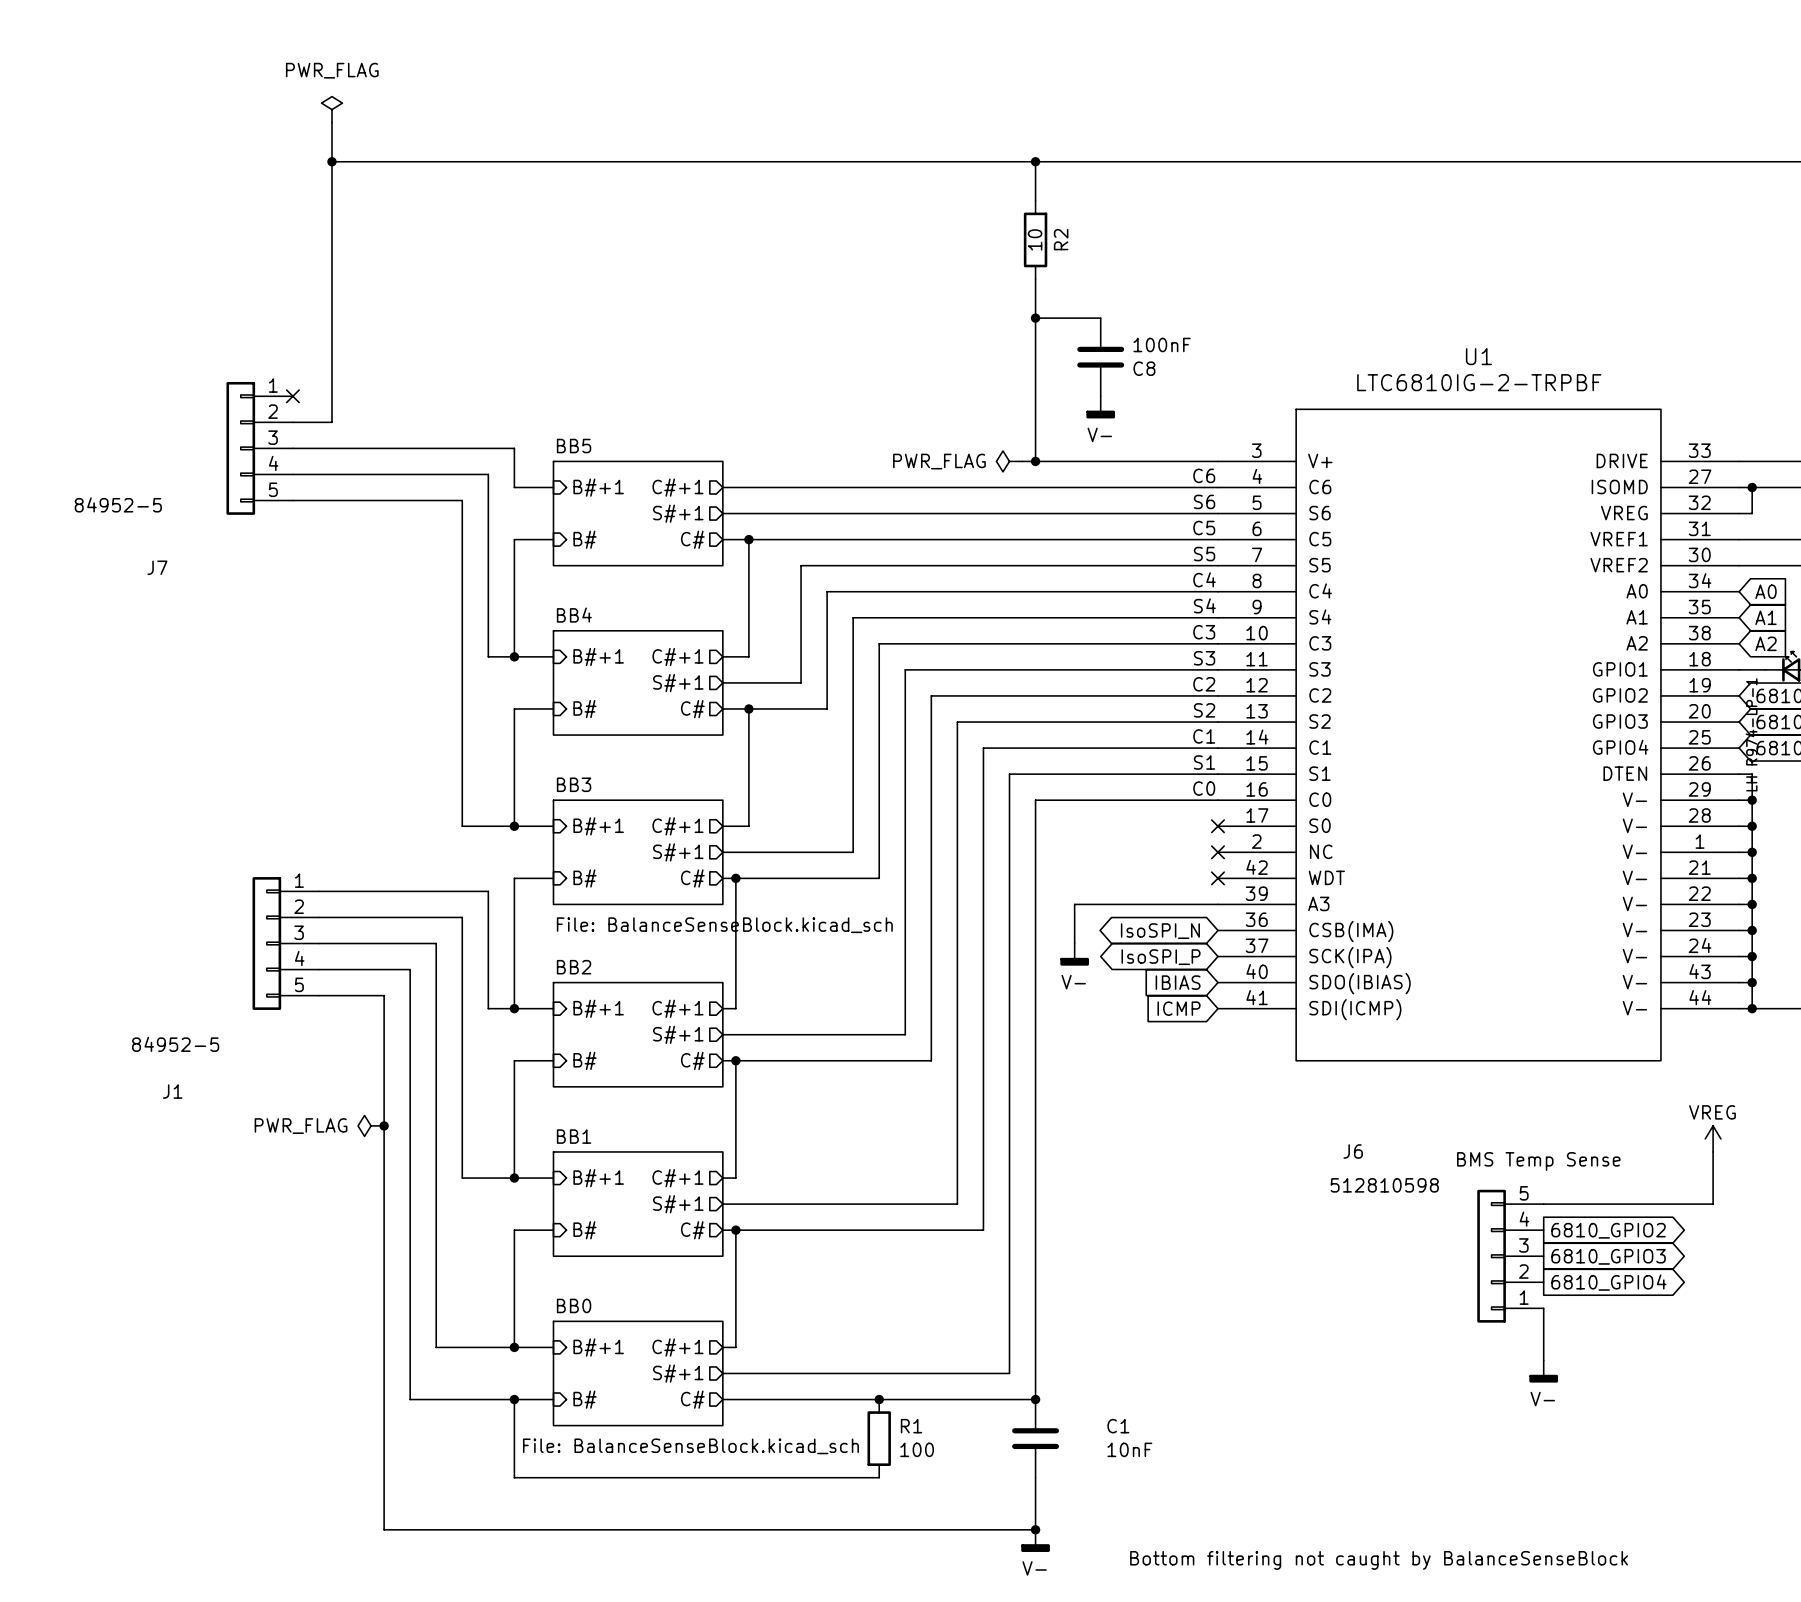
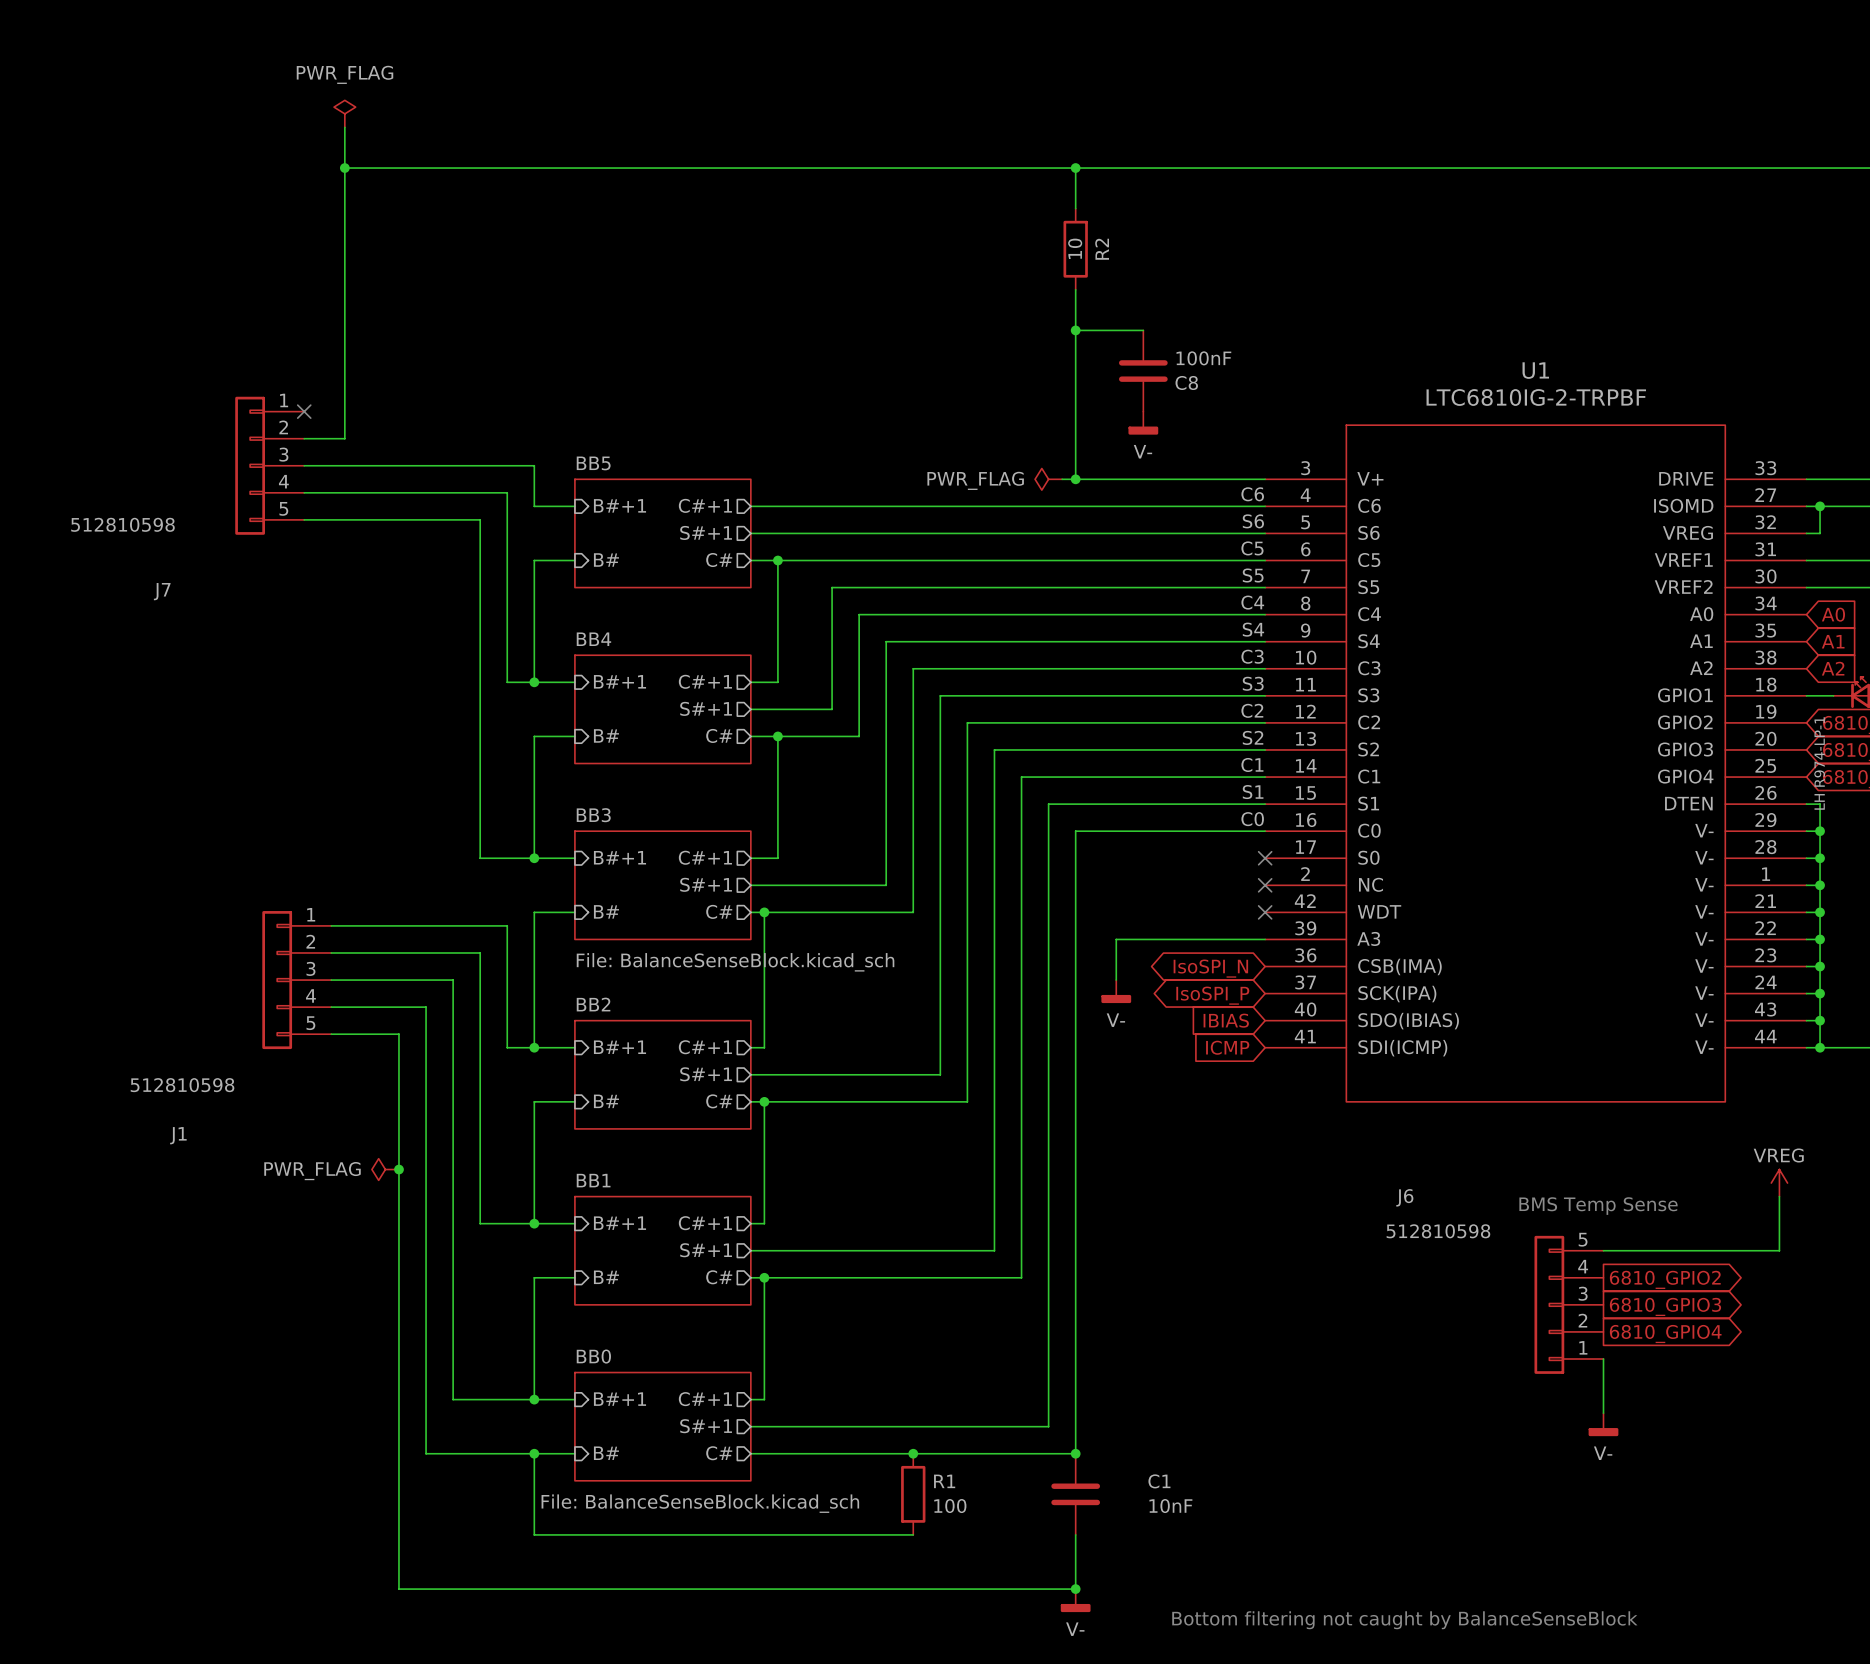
J7 value: 84952-5 (118, 504) -> 512810598 (122, 524)
J1 value: 84952-5 (175, 1044) -> 512810598 (182, 1085)

